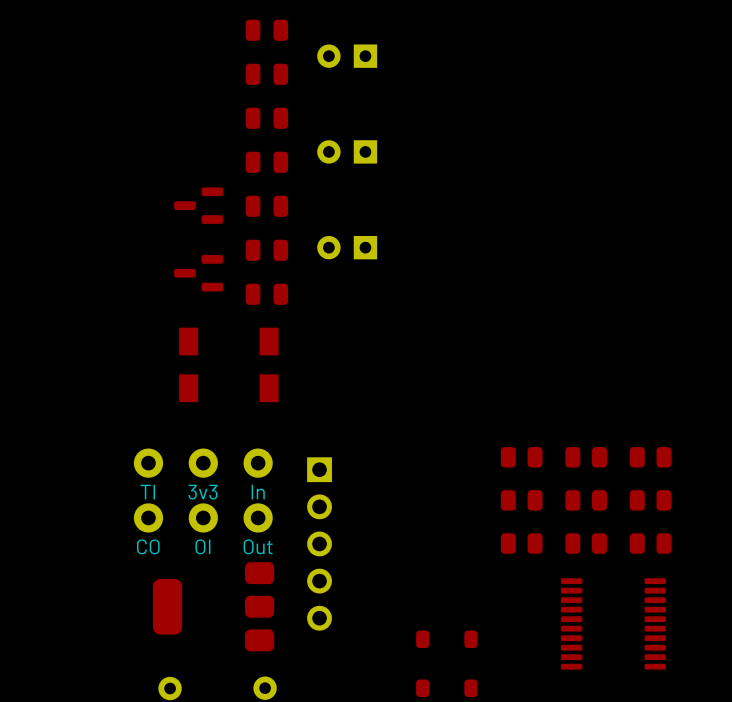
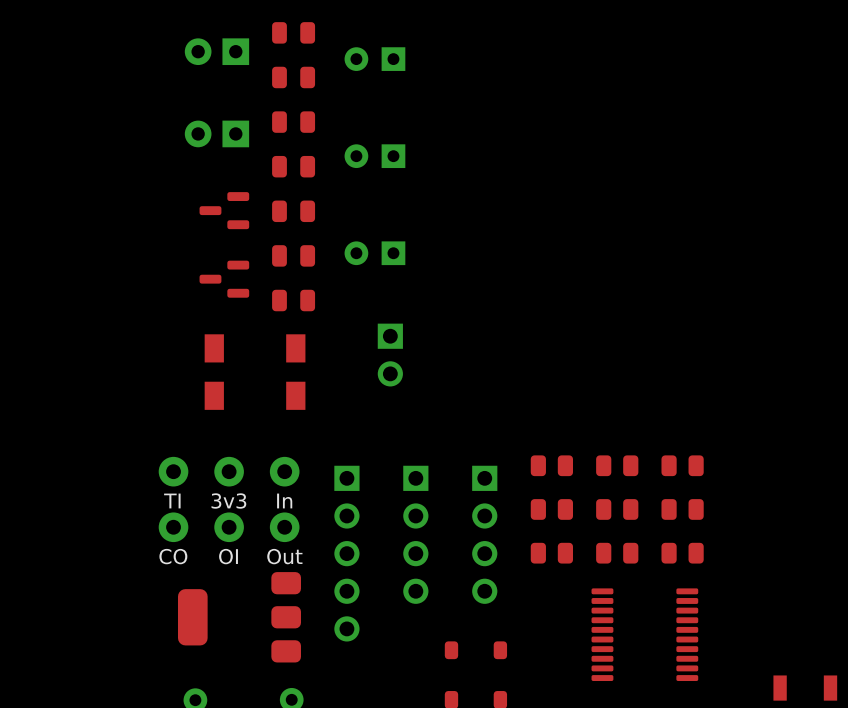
part: none -> (216, 51)
part: none -> (216, 133)
part: none -> (390, 355)
part: none -> (415, 534)
part: none -> (484, 534)

